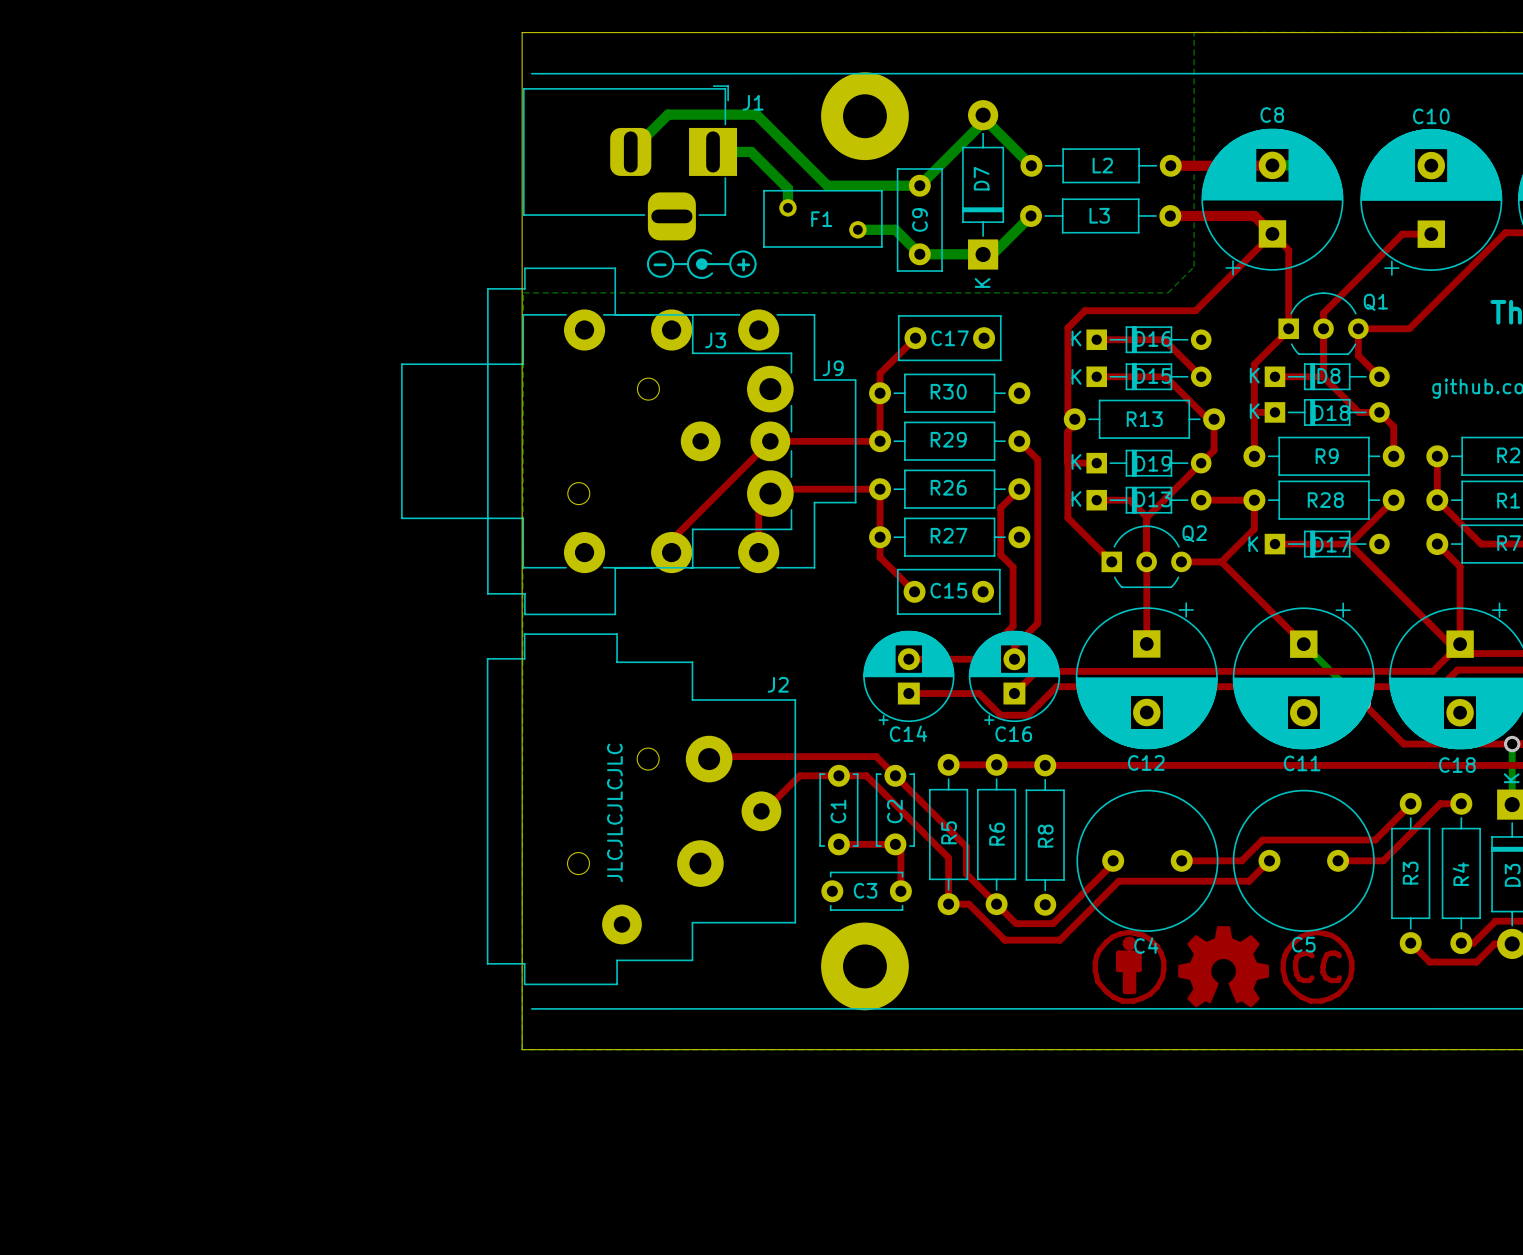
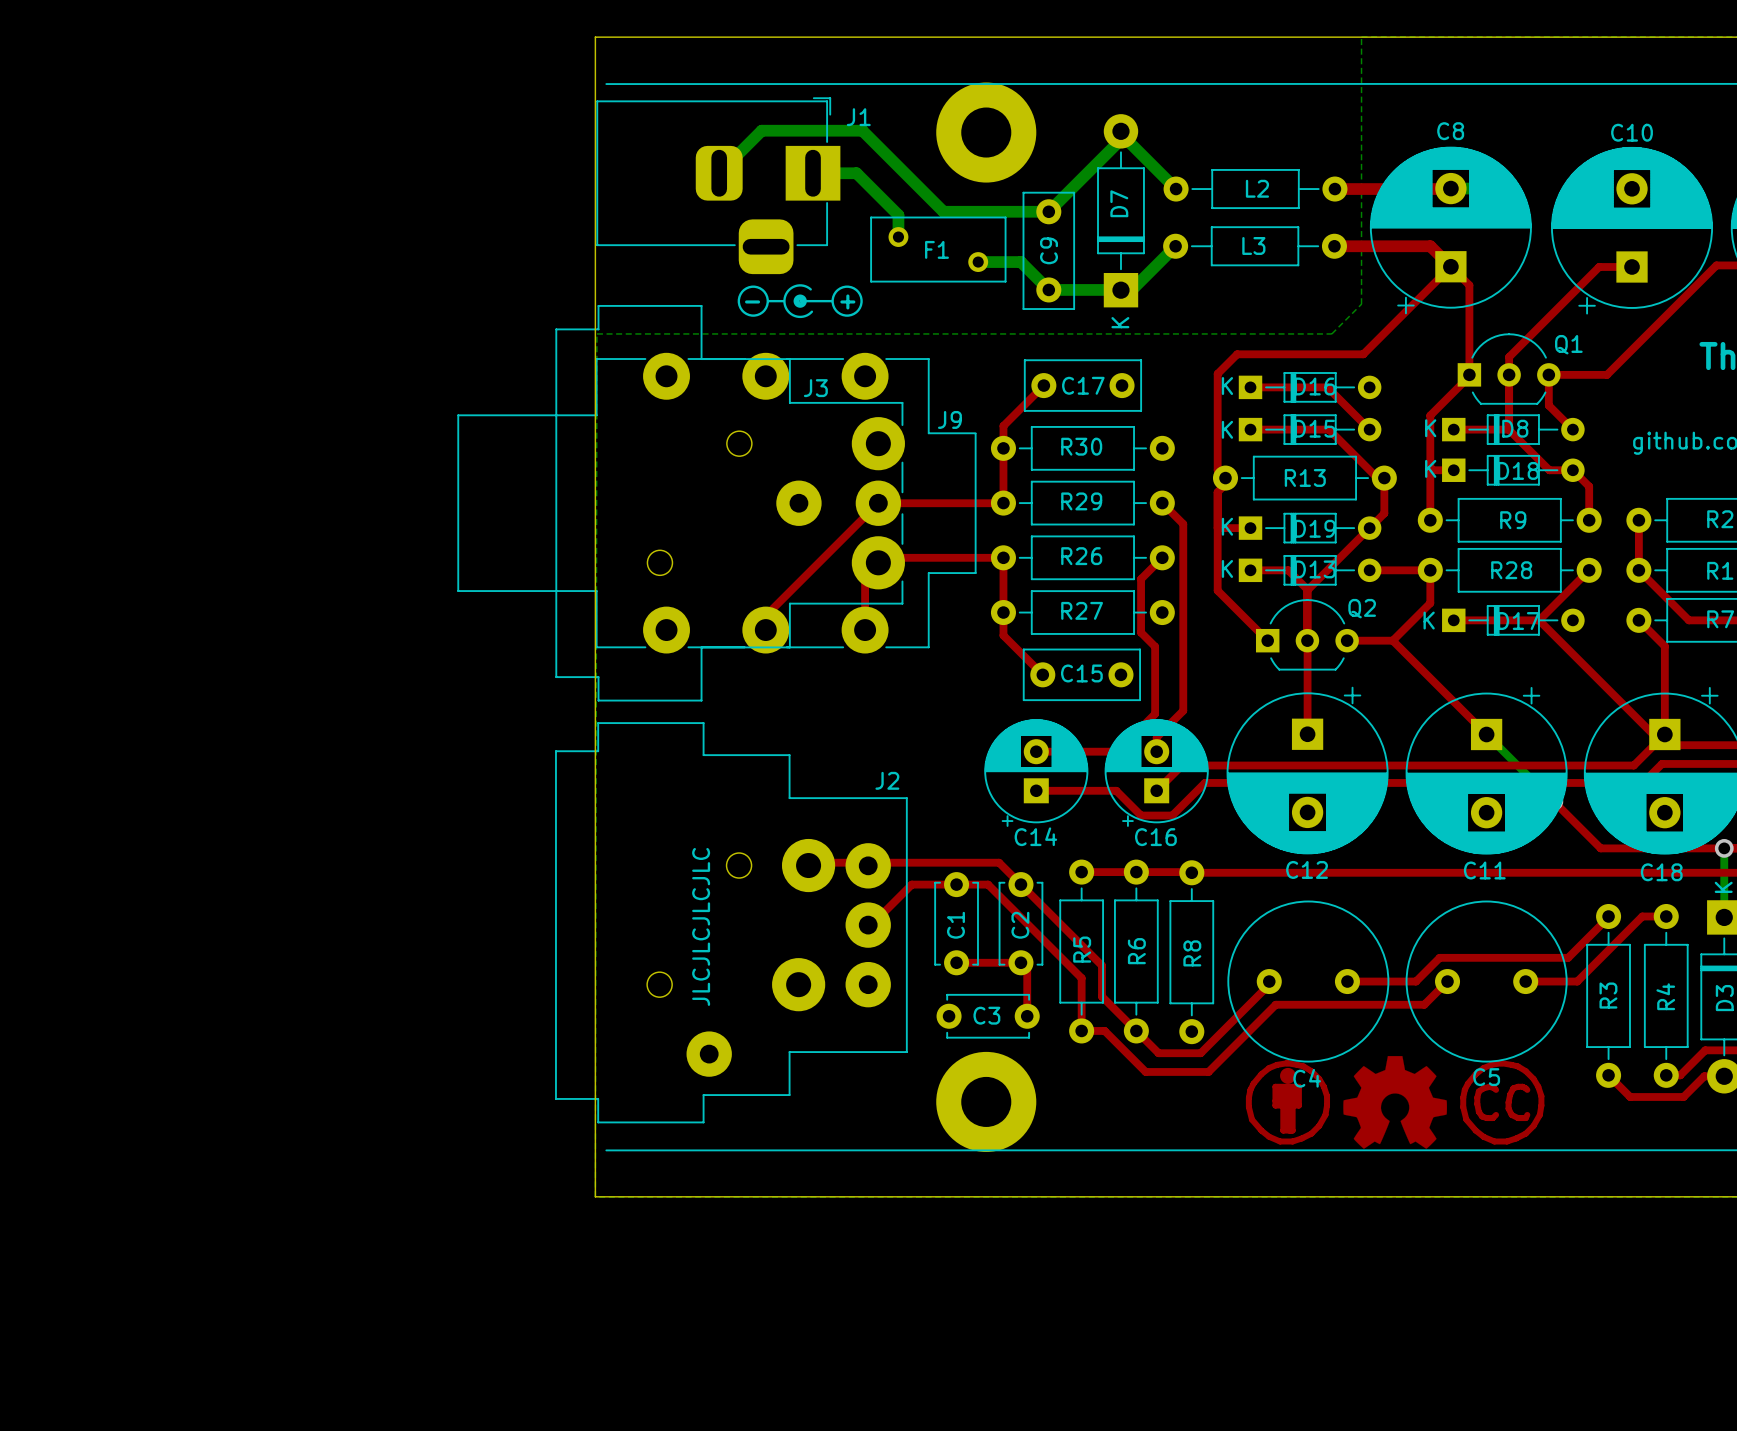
part: none -> (868, 865)
part: none -> (868, 984)

